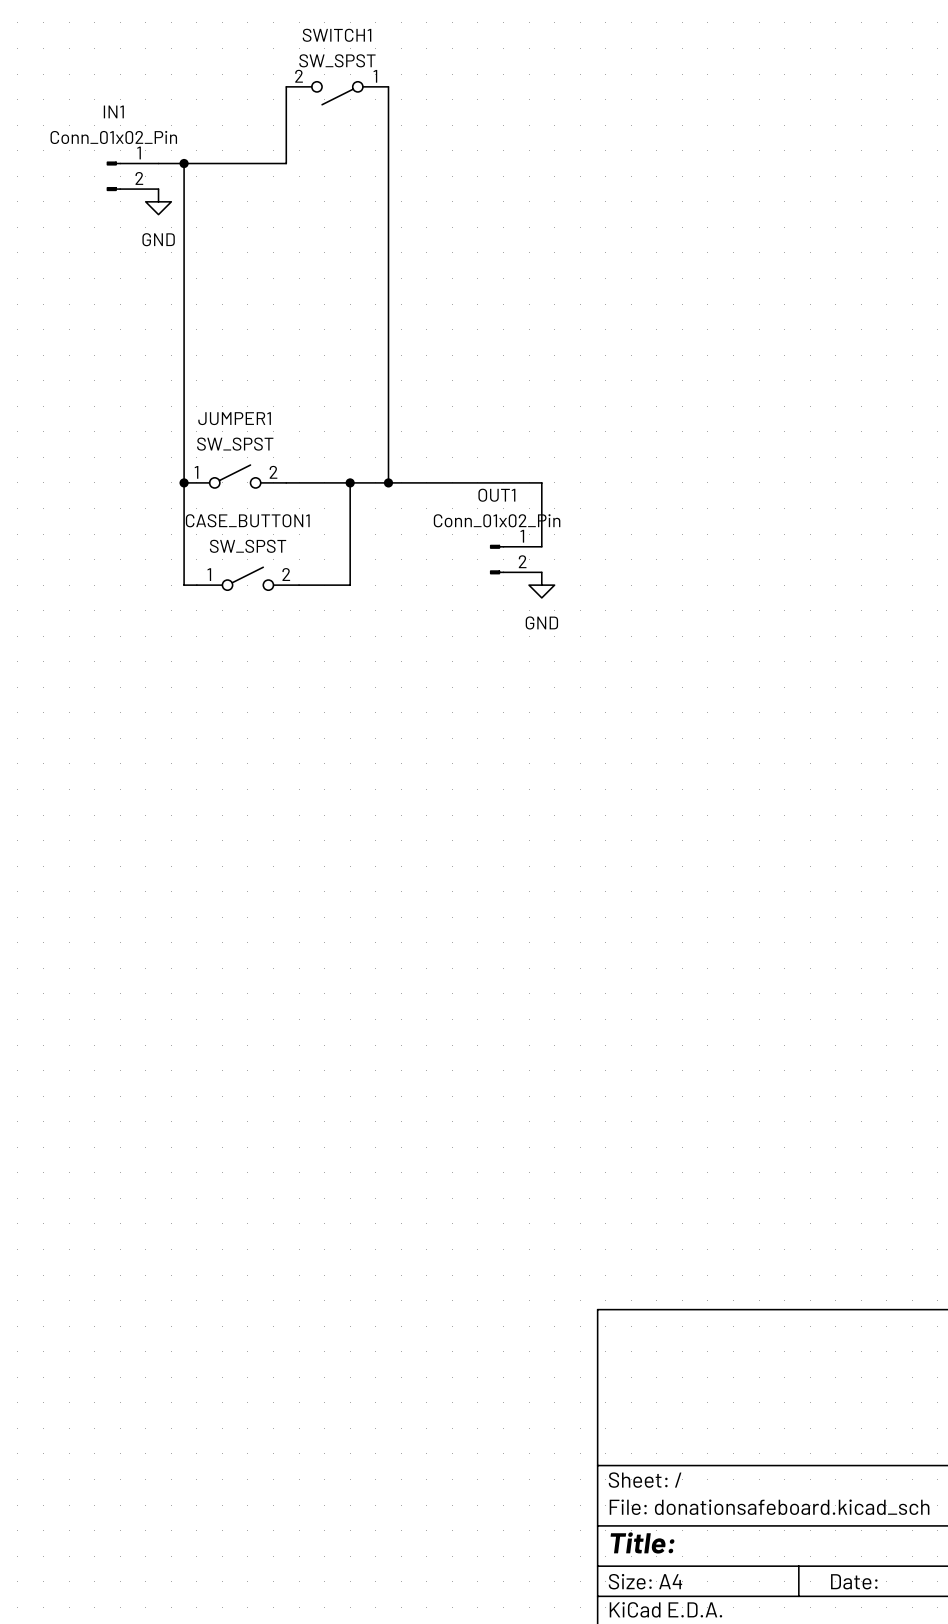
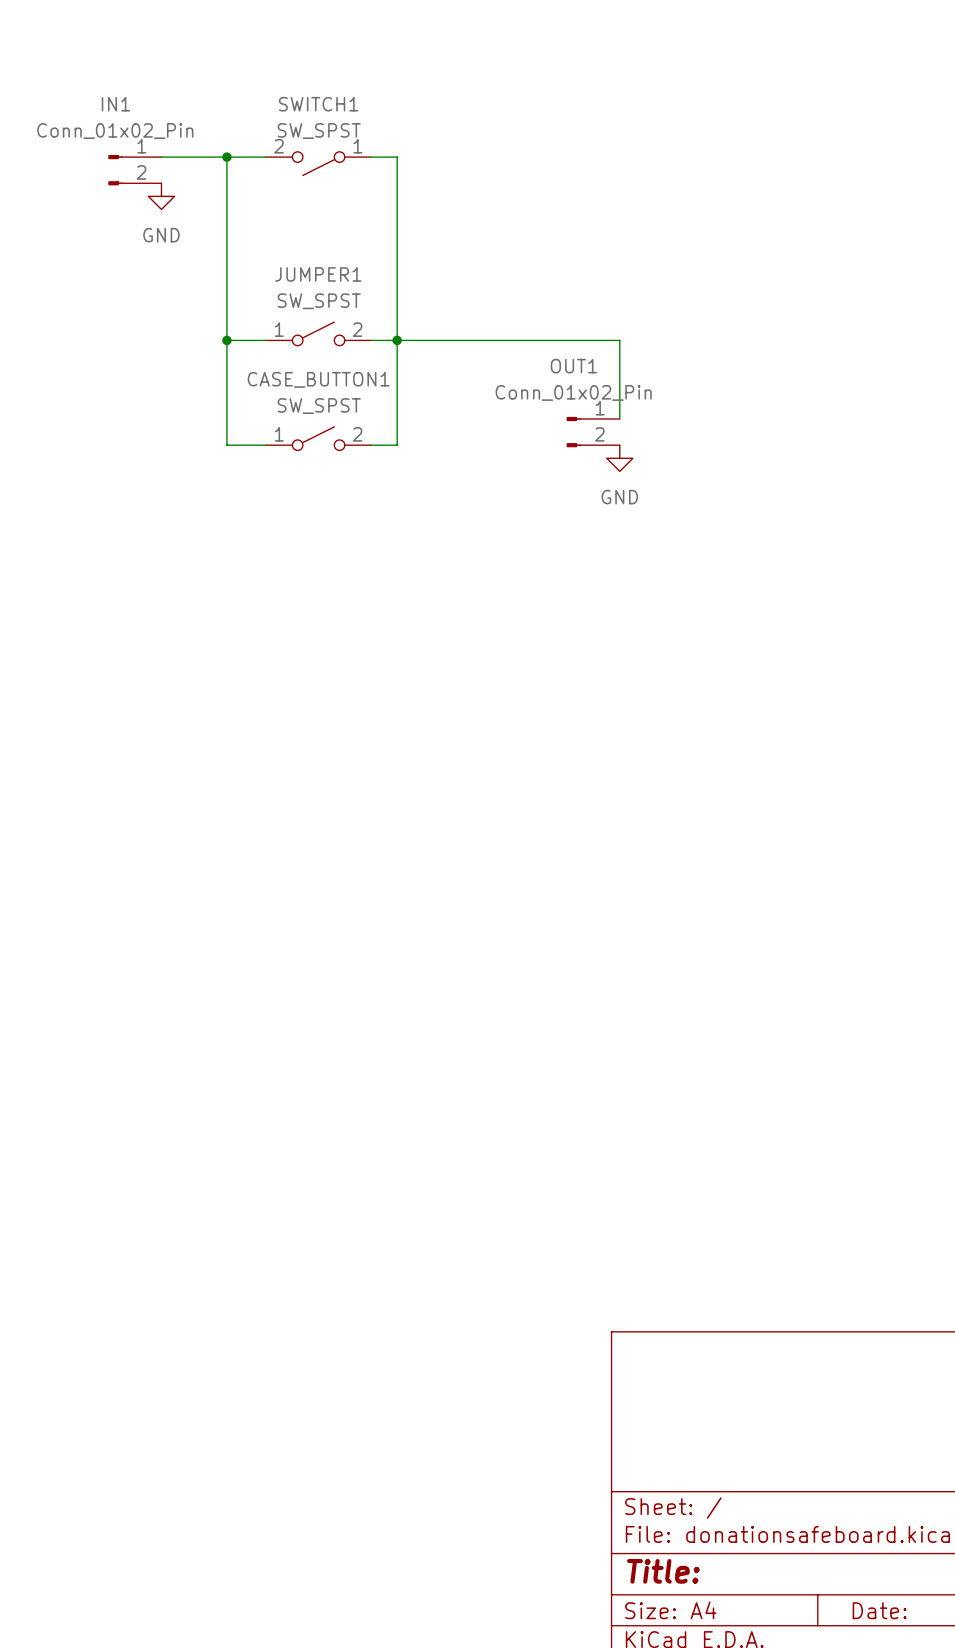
wire: (286, 86) (286, 163) (260, 163) -> none
wire: (388, 86) (388, 163) -> (370, 157) (397, 157)
SWITCH1 position: (337, 93) -> (318, 163)
wire: (184, 163) (184, 585) (196, 585) -> none
junction position: (184, 163) -> (226, 157)
wire: none -> (226, 157) (226, 445) (266, 445)
wire: none -> (226, 340) (266, 340)
junction: none -> (226, 340)
wire: none -> (370, 340) (619, 340) (619, 418)
junction: none -> (397, 340)
wire: (388, 444) (388, 482) -> (397, 445) (370, 445)
JUMPER1 position: (235, 476) -> (318, 333)
junction: (184, 482) -> none
wire: (286, 482) (541, 482) (541, 546) -> none
wire: (350, 482) (350, 585) (299, 585) -> none
junction: (350, 482) -> none
junction: (388, 482) -> none
OUT1 position: (515, 559) -> (593, 432)
CASE_BUTTON1 position: (247, 578) -> (318, 438)
power symbol position: GND (541, 585) -> GND (619, 458)

